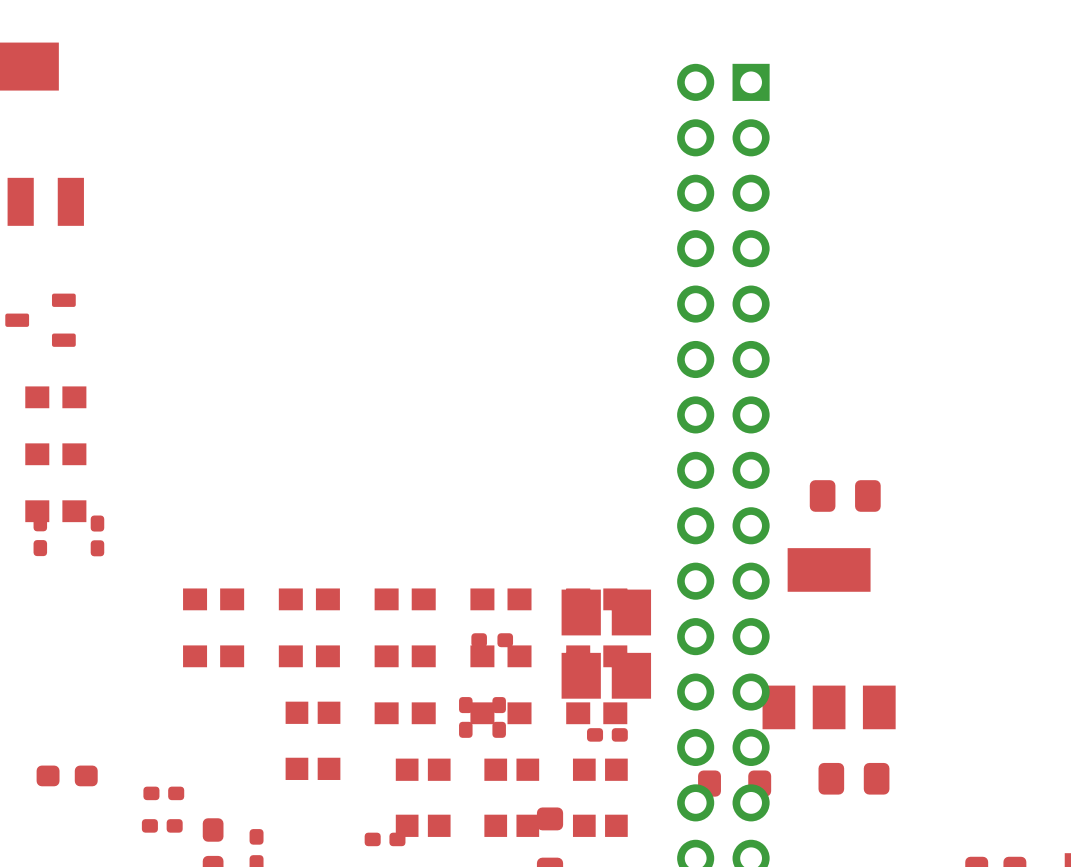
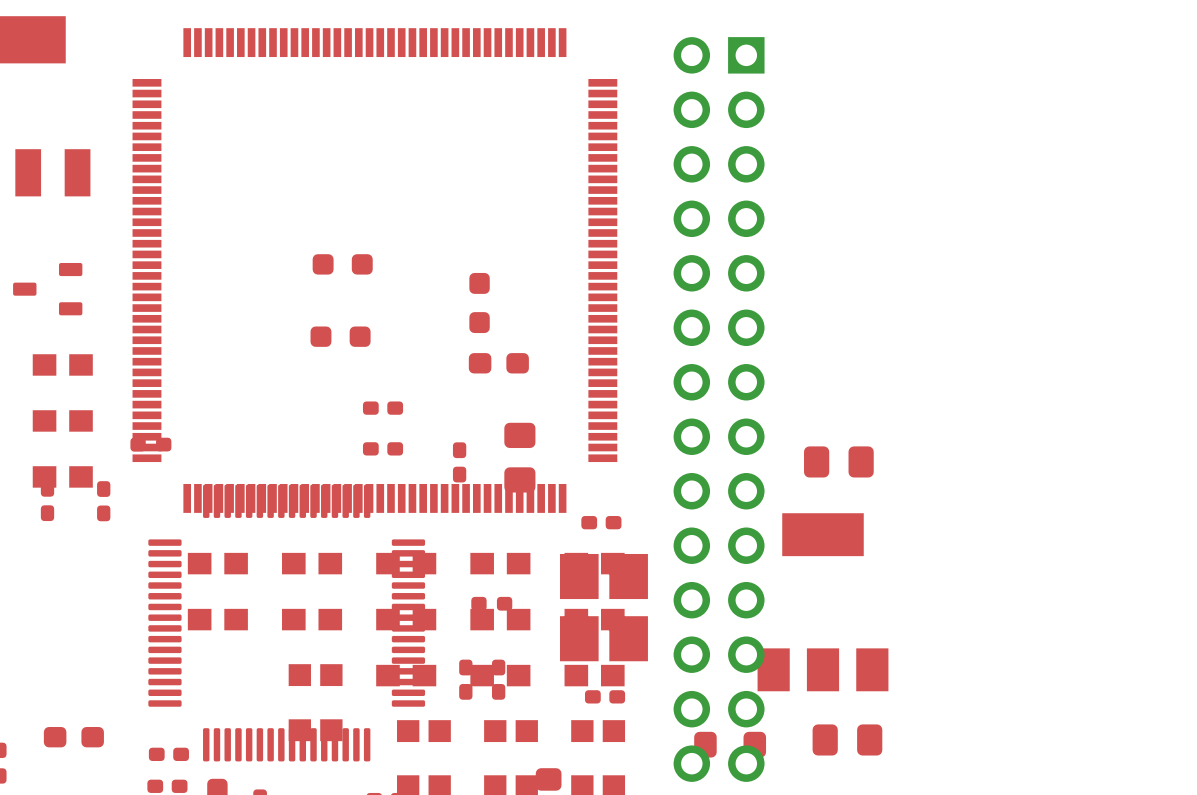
part: none -> (342, 264)
part: none -> (374, 270)
part: none -> (479, 303)
part: none -> (340, 336)
part: none -> (498, 363)
part: none -> (383, 408)
part: none -> (150, 444)
part: none -> (383, 448)
part: none -> (519, 457)
part: none -> (459, 462)
part: none -> (601, 522)
part: none -> (286, 623)

